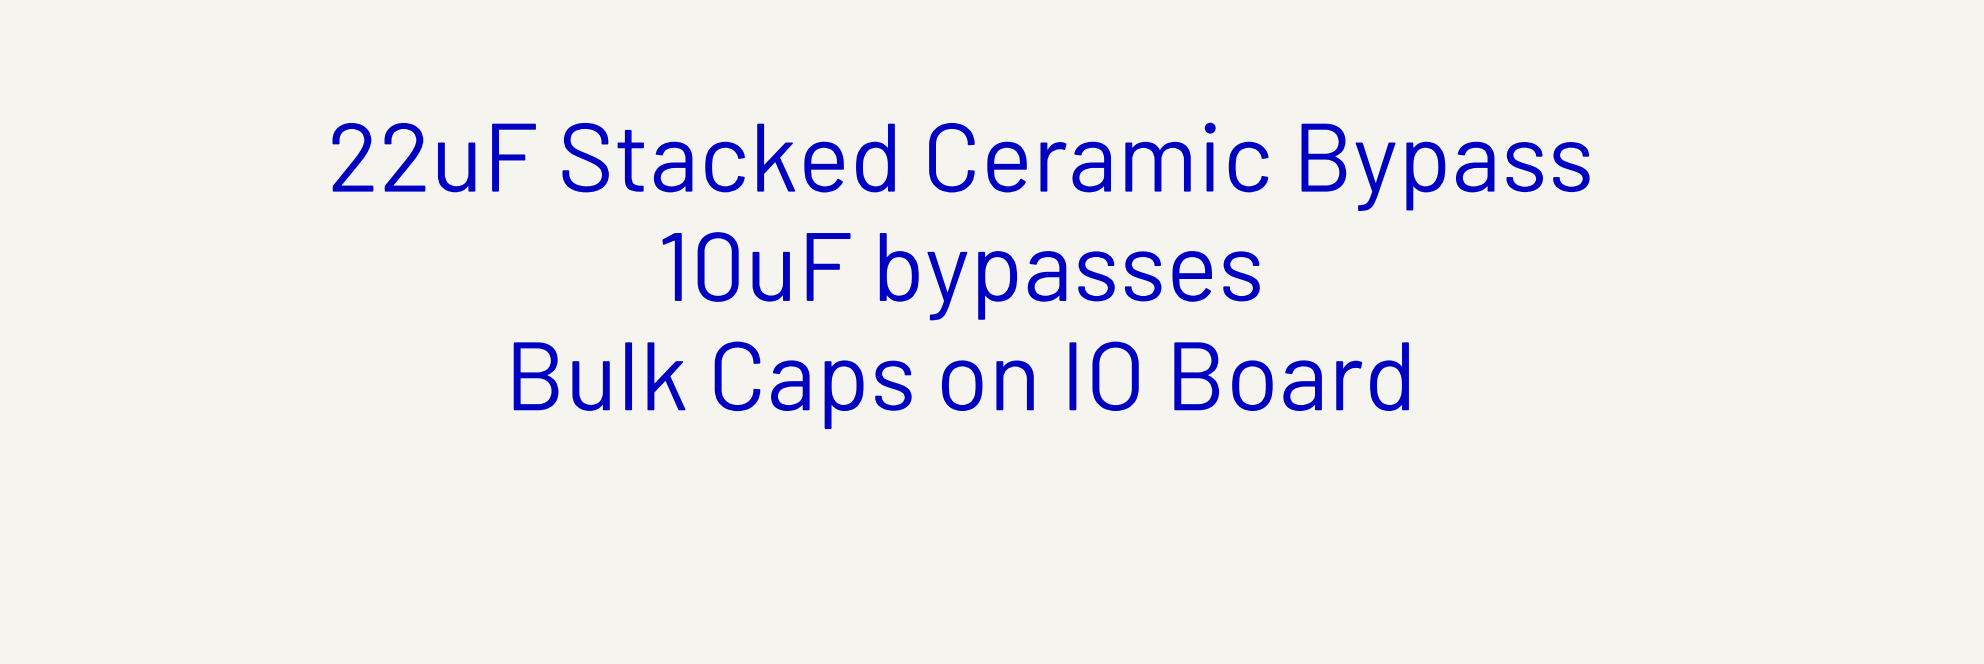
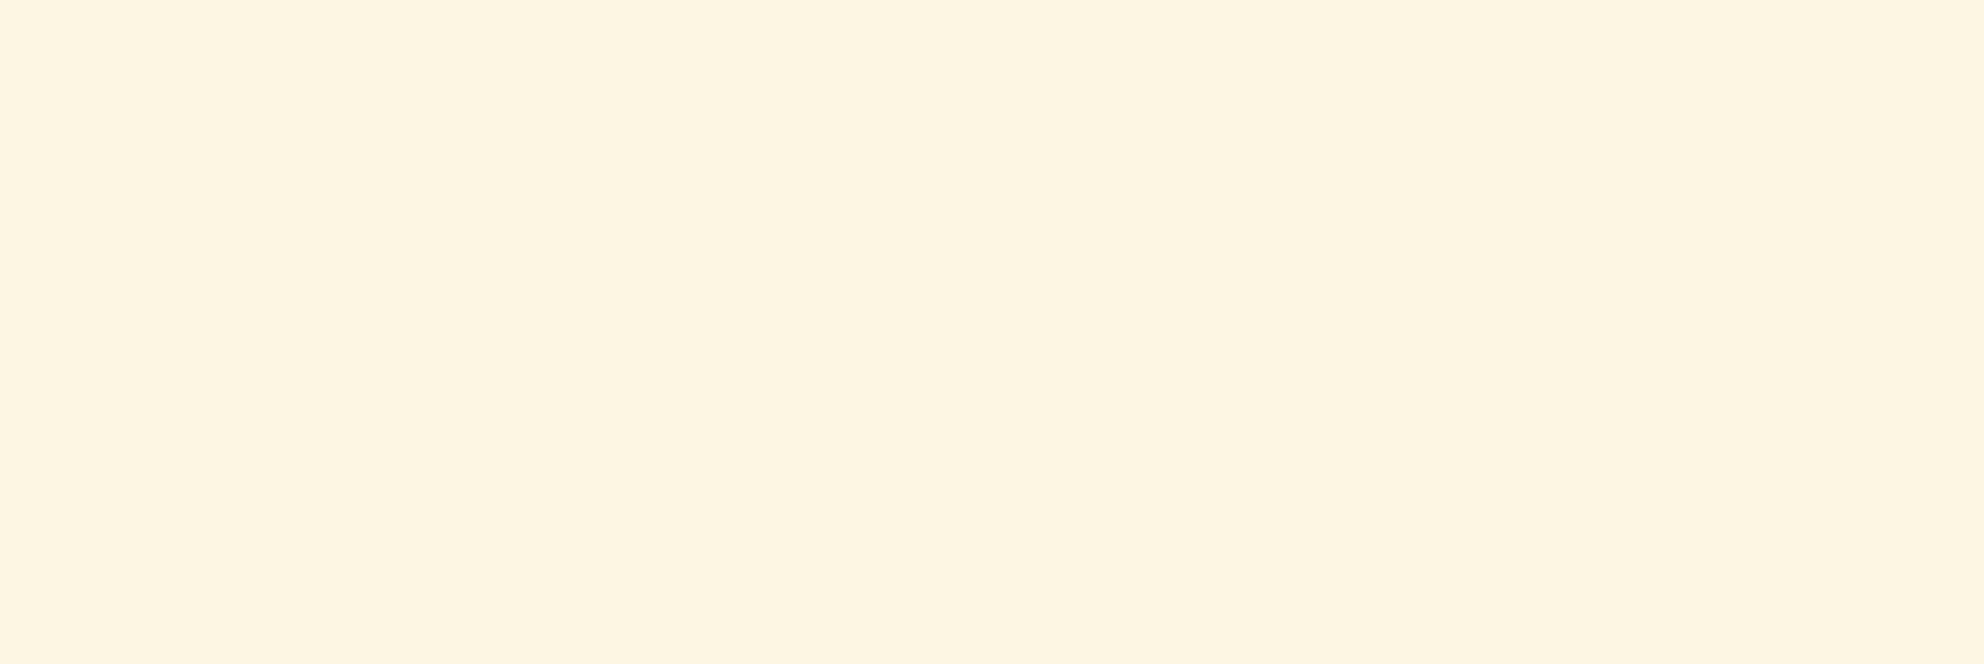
text: 22uF Stacked Ceramic Bypass (961, 166) -> none
text: 10uF bypasses (961, 276) -> none
text: Bulk Caps on IO Board (961, 385) -> none

